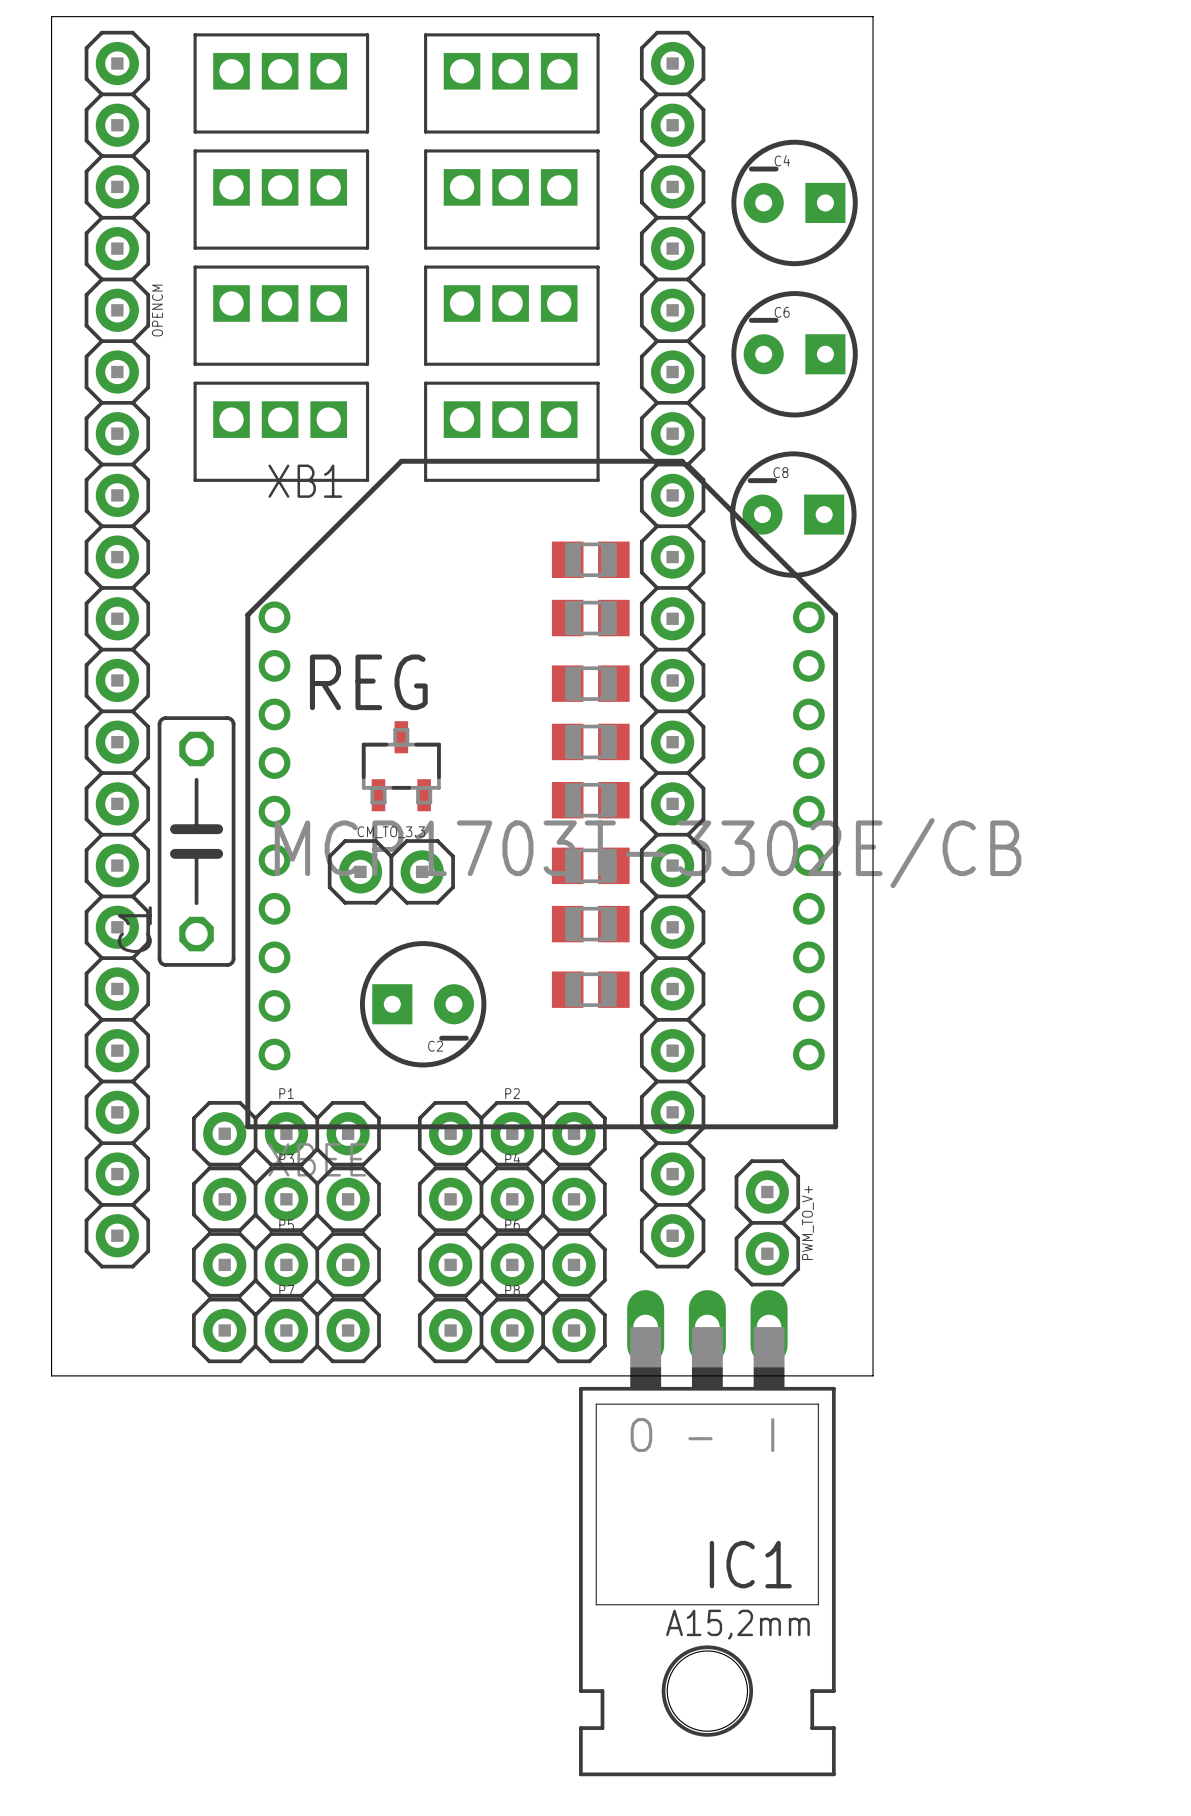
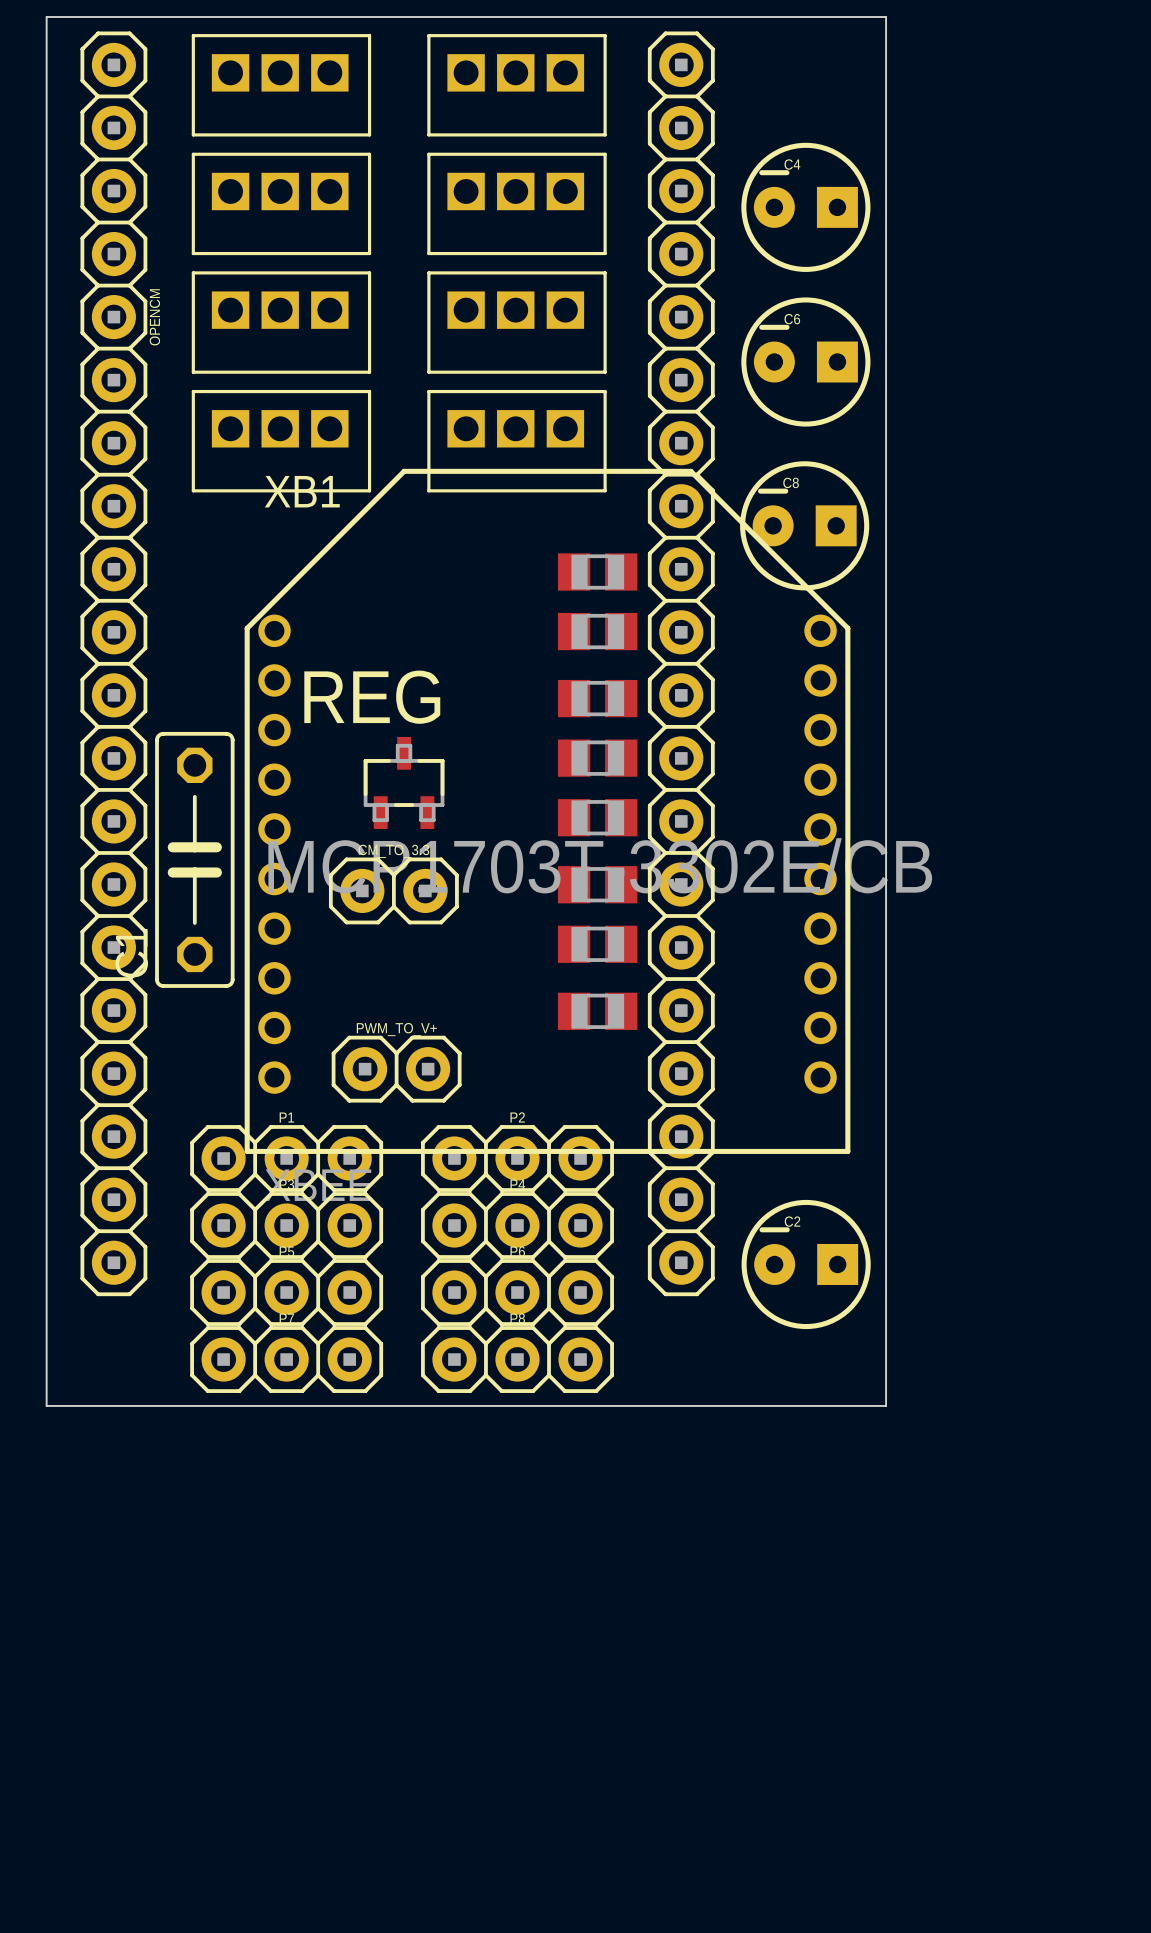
C2 rotation: 0° (423, 1004) -> 180° (806, 1264)
C2 position: (423, 1004) -> (806, 1264)
PWM_TO_V+ rotation: 0° (767, 1222) -> 90° clockwise (396, 1069)
PWM_TO_V+ position: (767, 1222) -> (396, 1069)
PWM_TO_V+ name position: PWM_TO_V+ (807, 1222) -> PWM_TO_V+ (396, 1029)
IC1: (707, 1533) -> none

